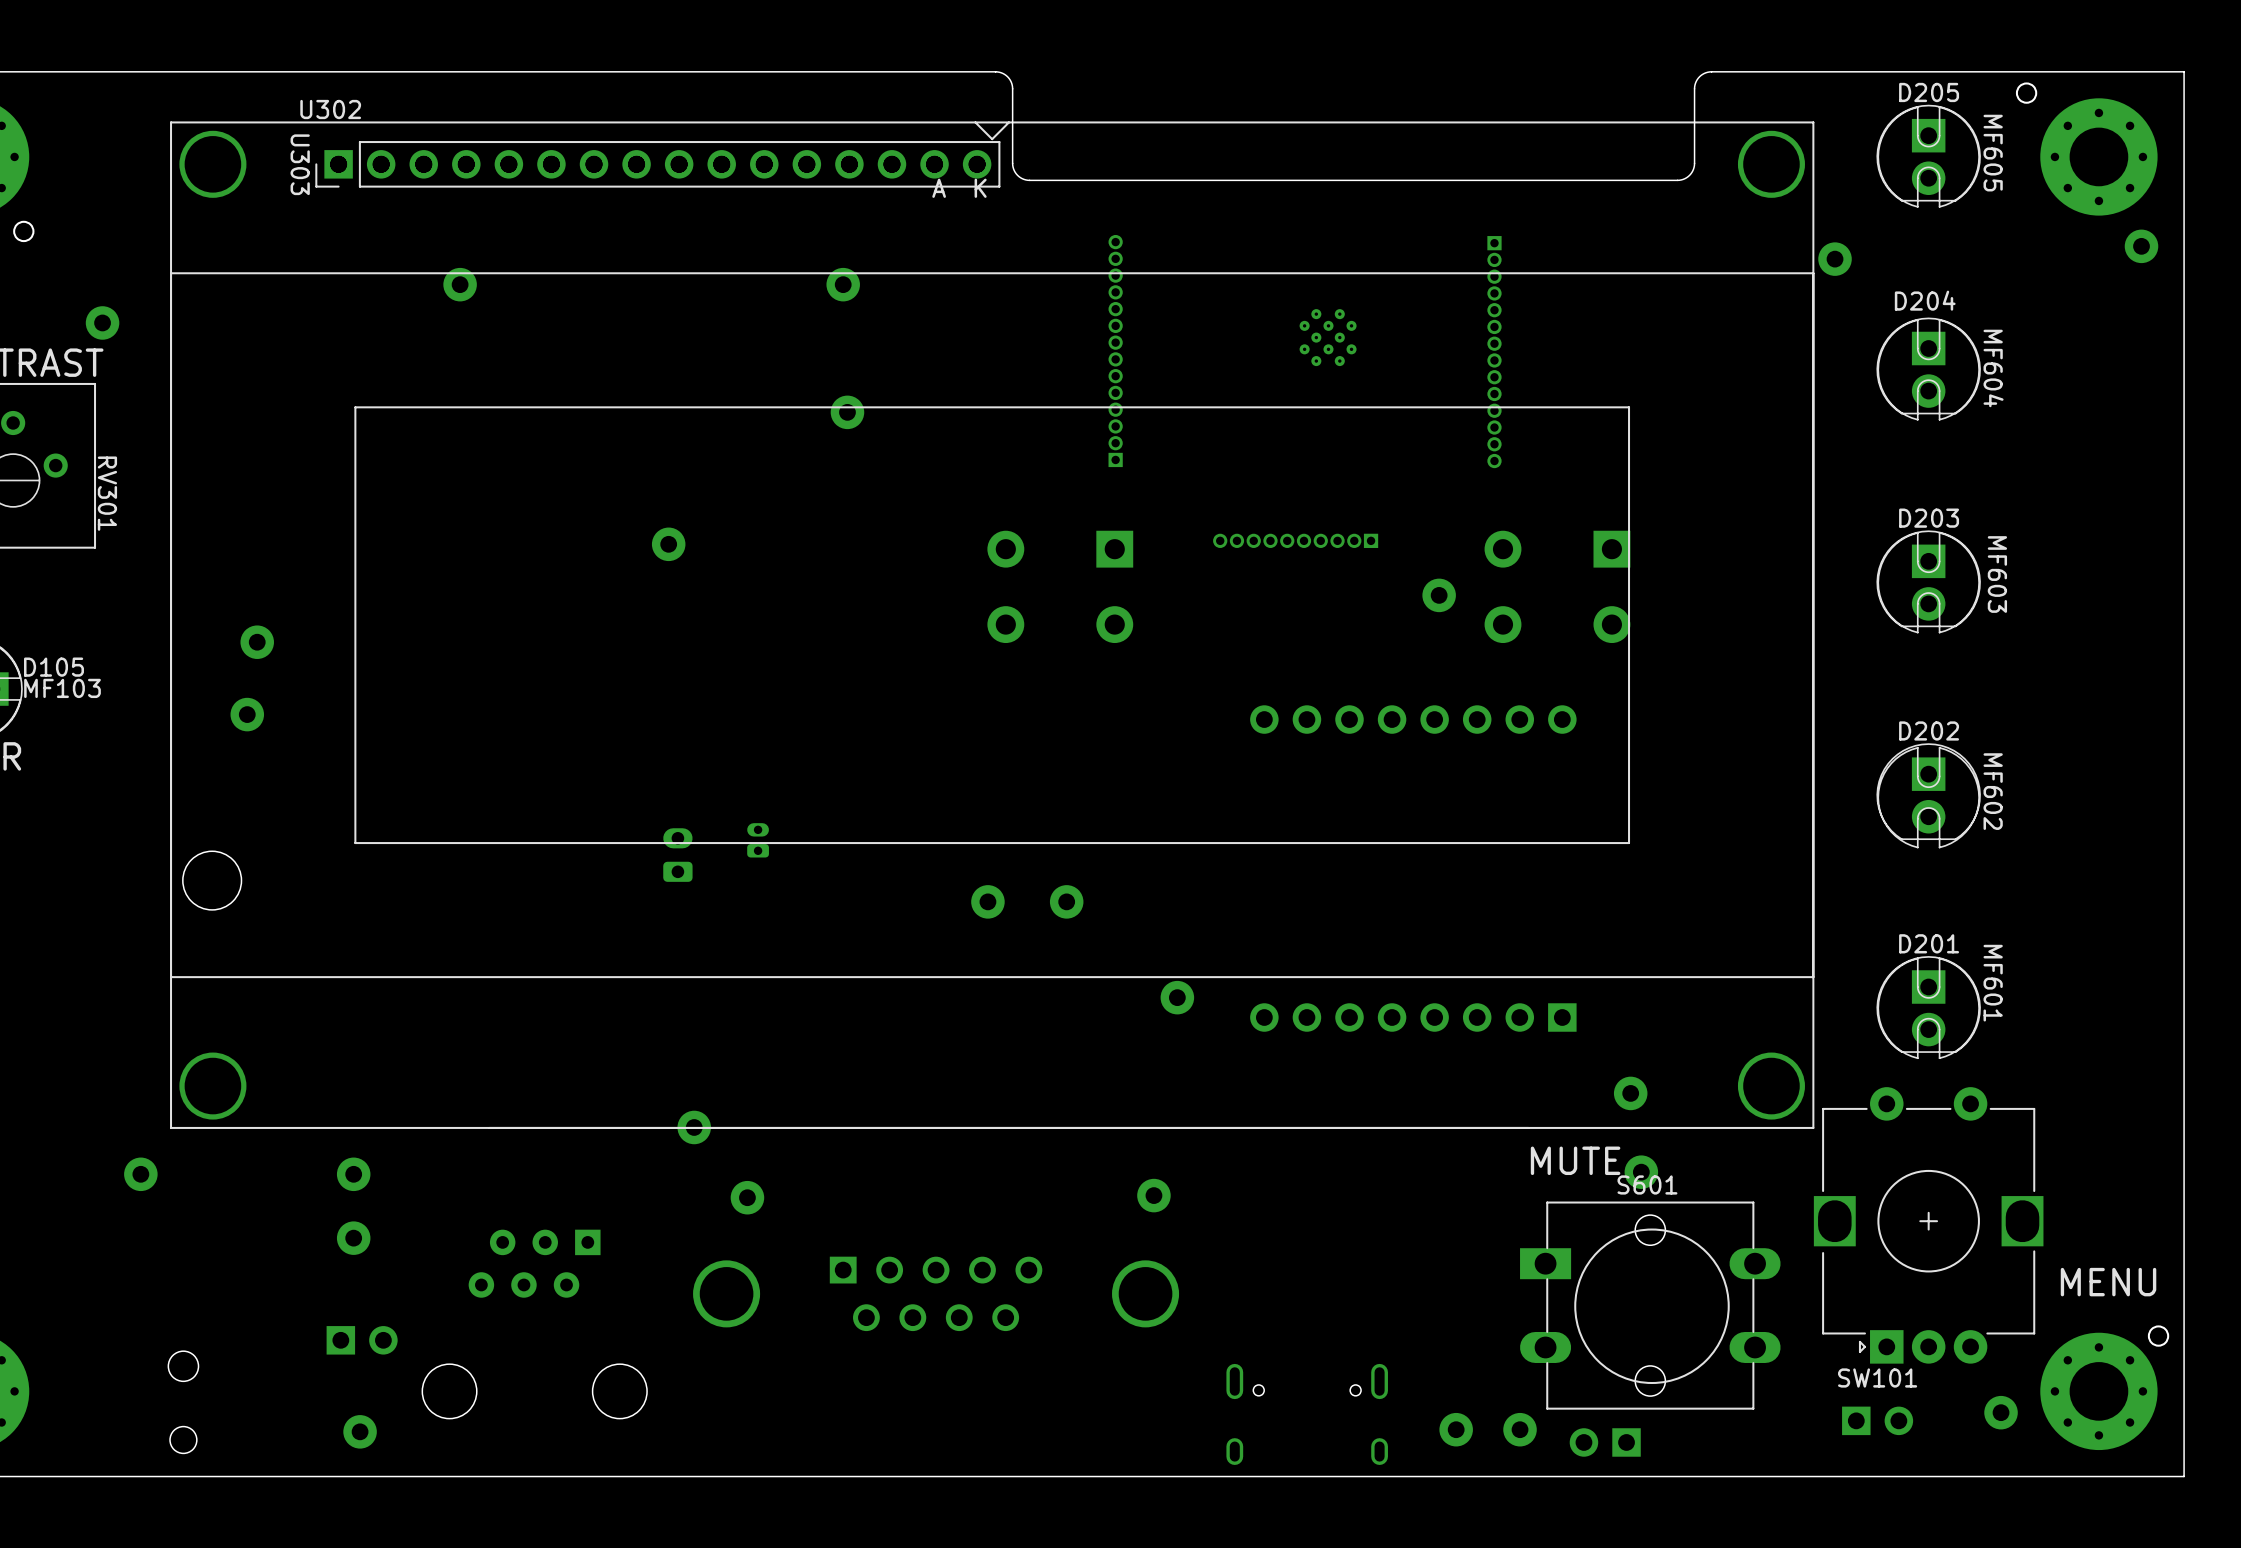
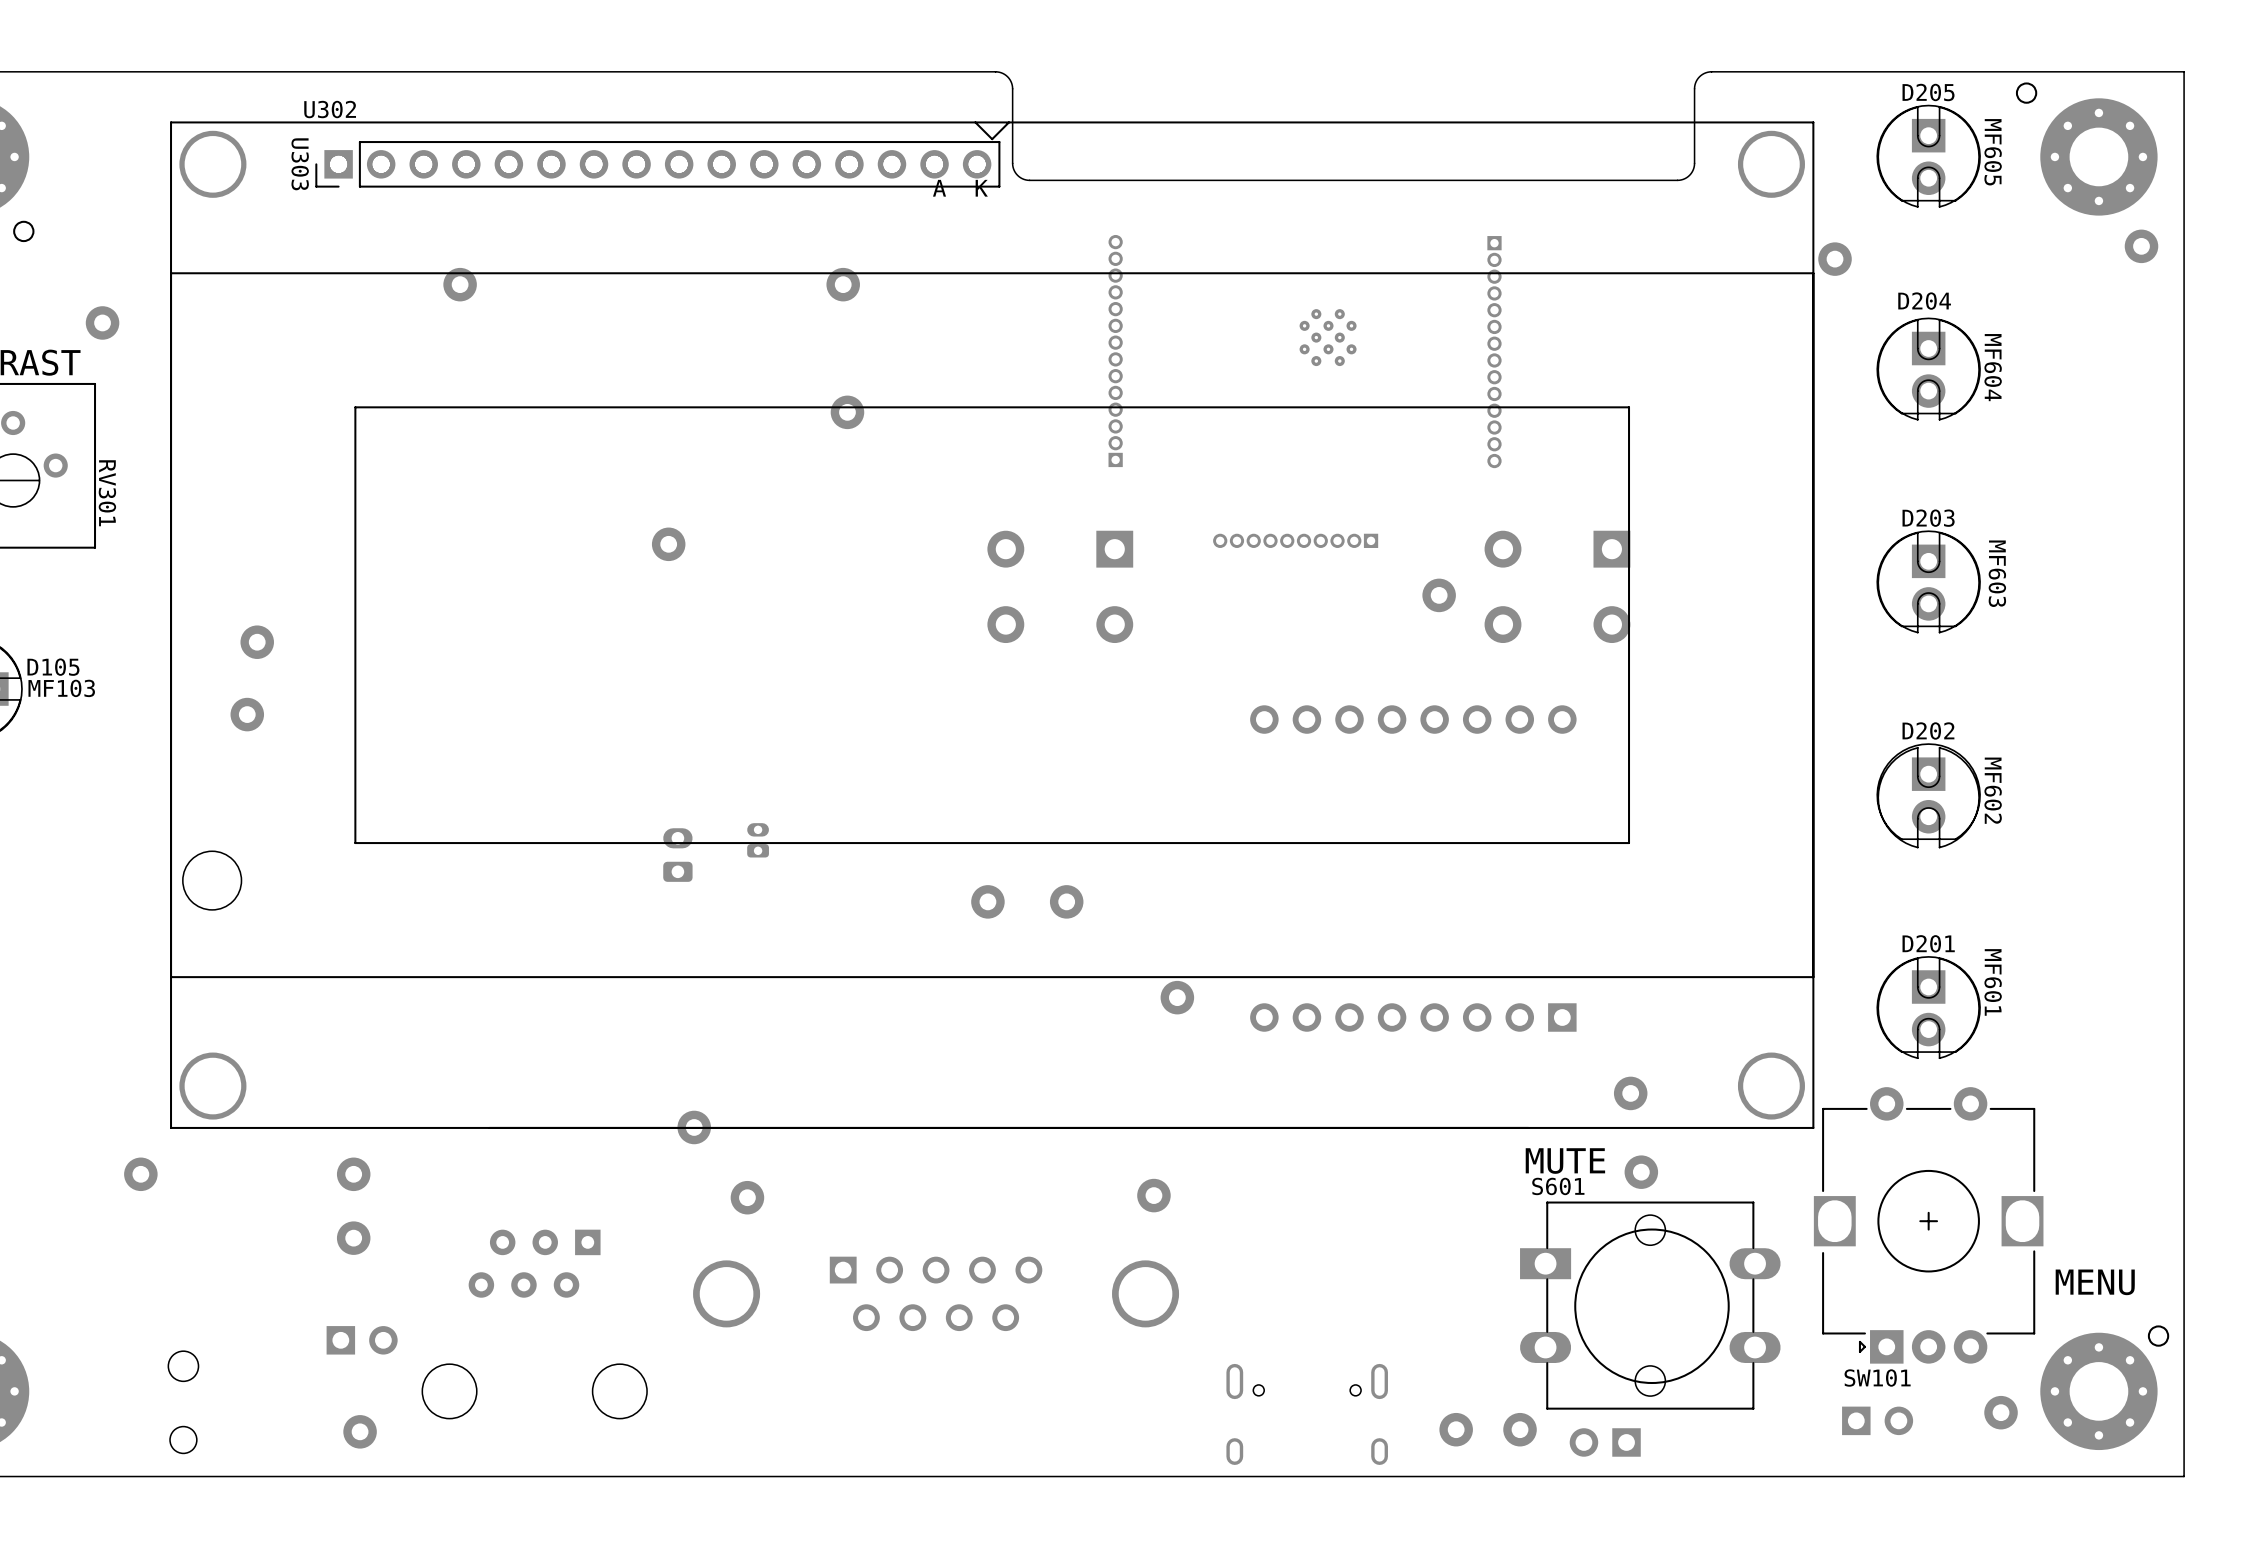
S601 name position: S601 (1647, 1184) -> S601 (1558, 1186)

